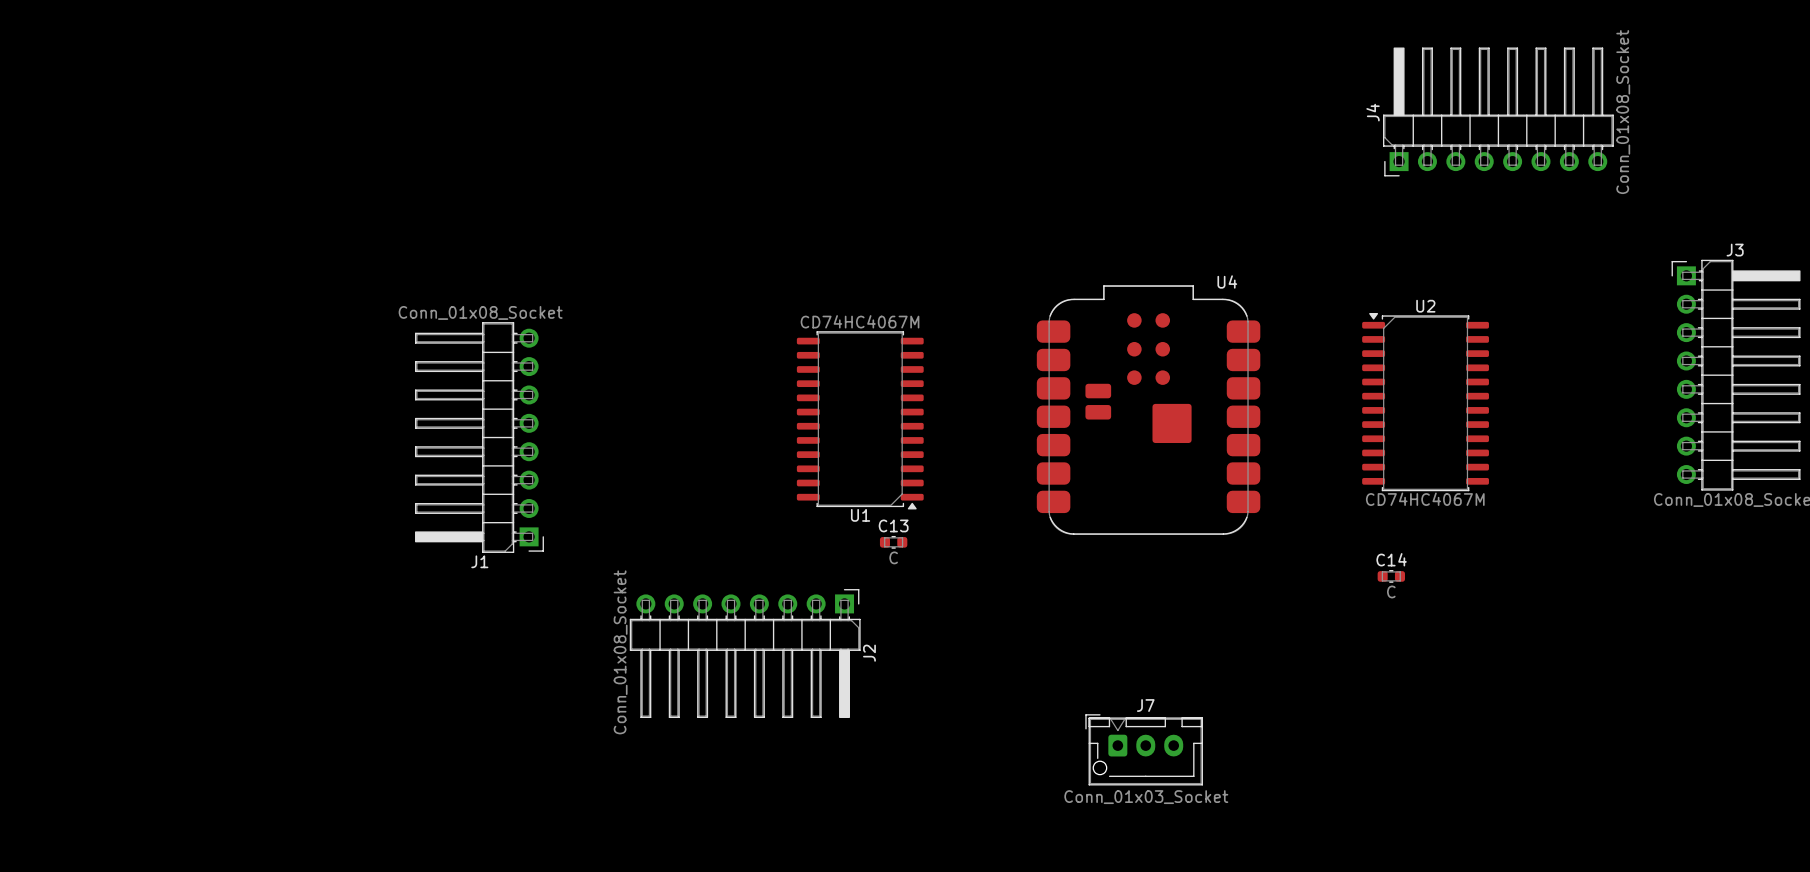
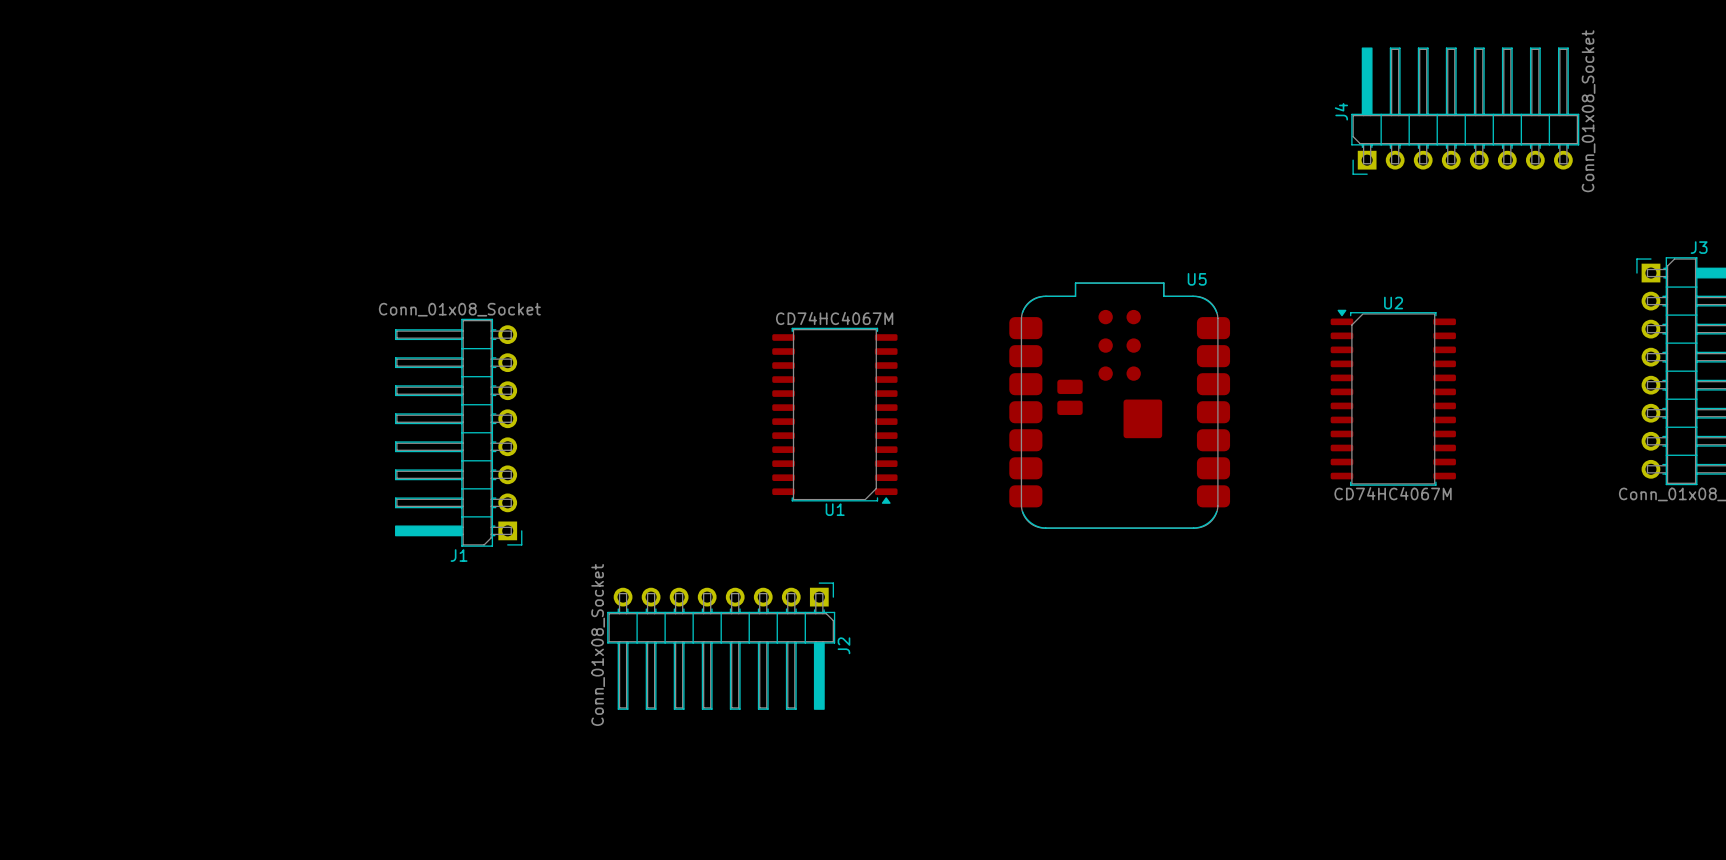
U4 name: U4 (1227, 281) -> U5 (1197, 279)
C13: C (893, 542) -> none
C14: C (1391, 576) -> none
J7: Conn_01x03_Socket (1144, 749) -> none

